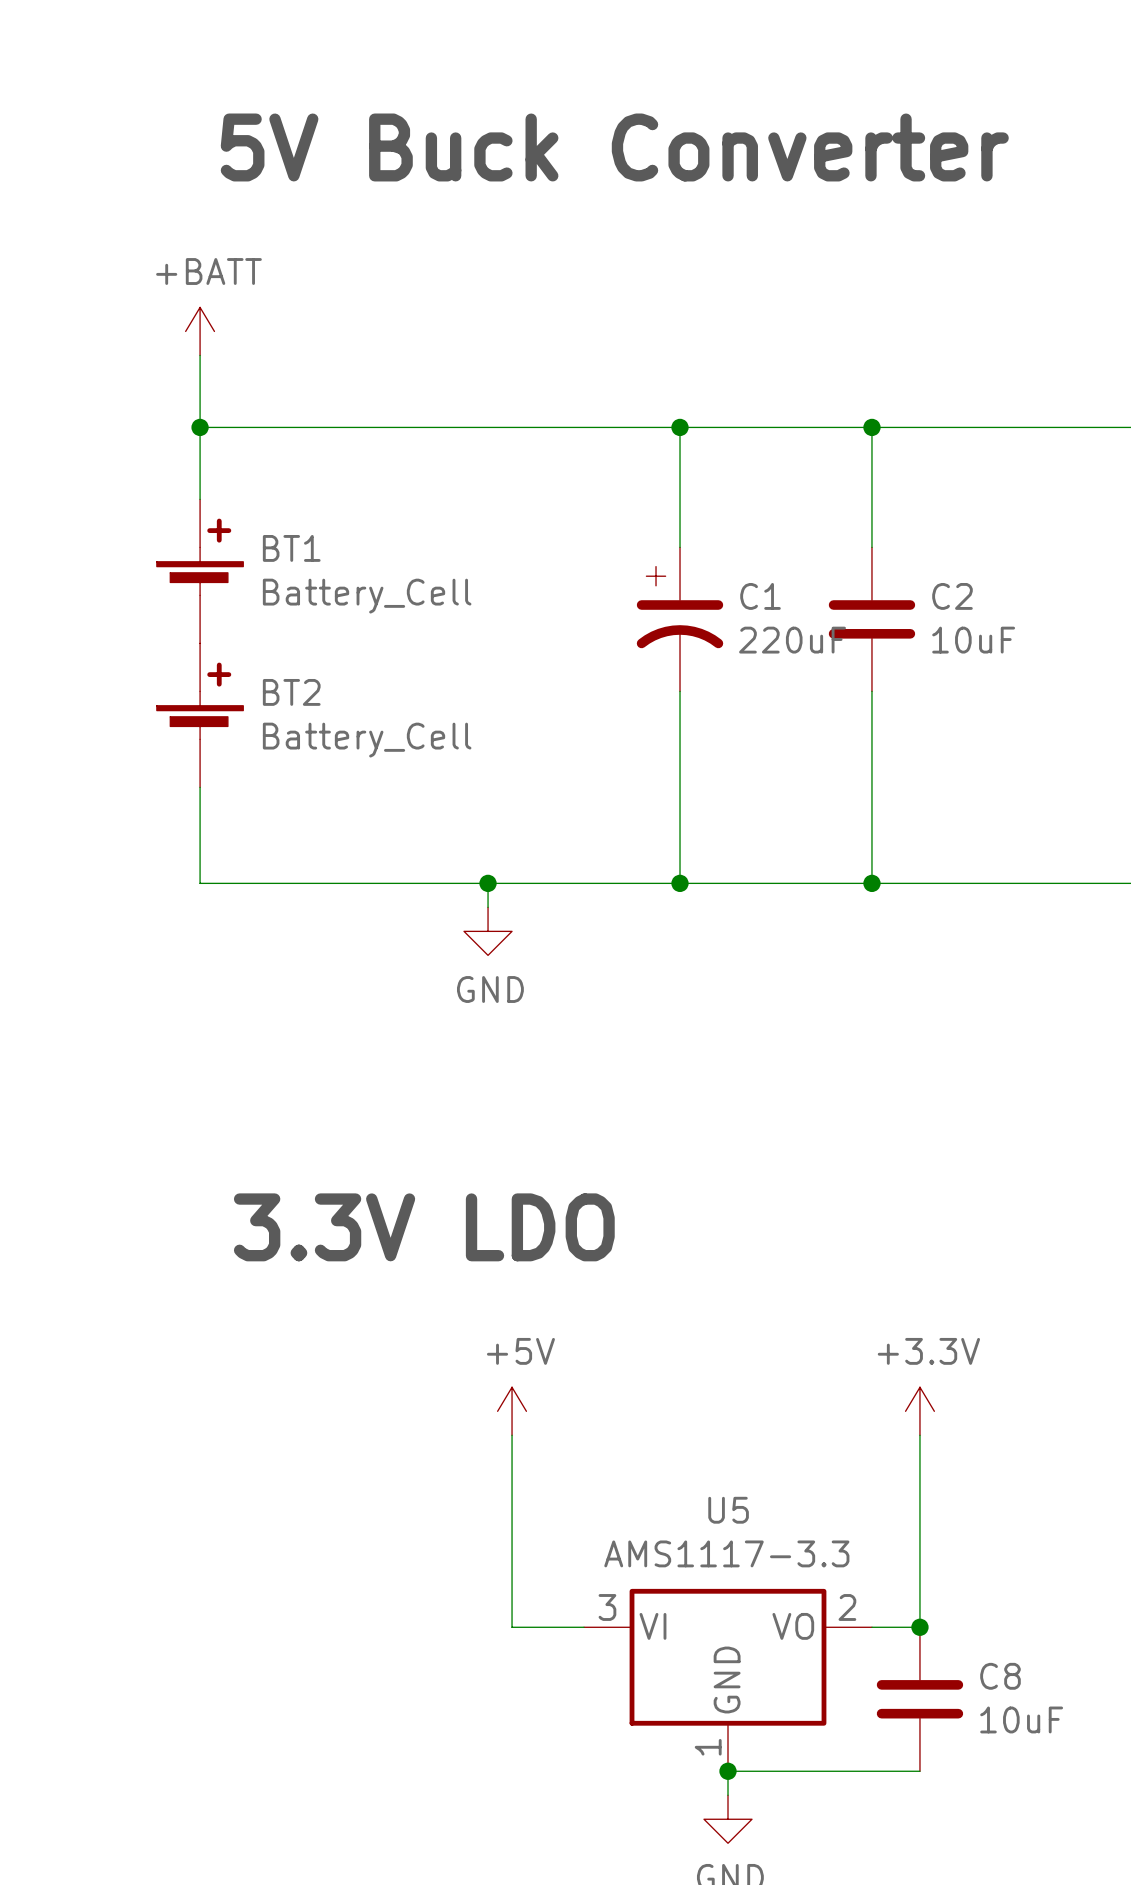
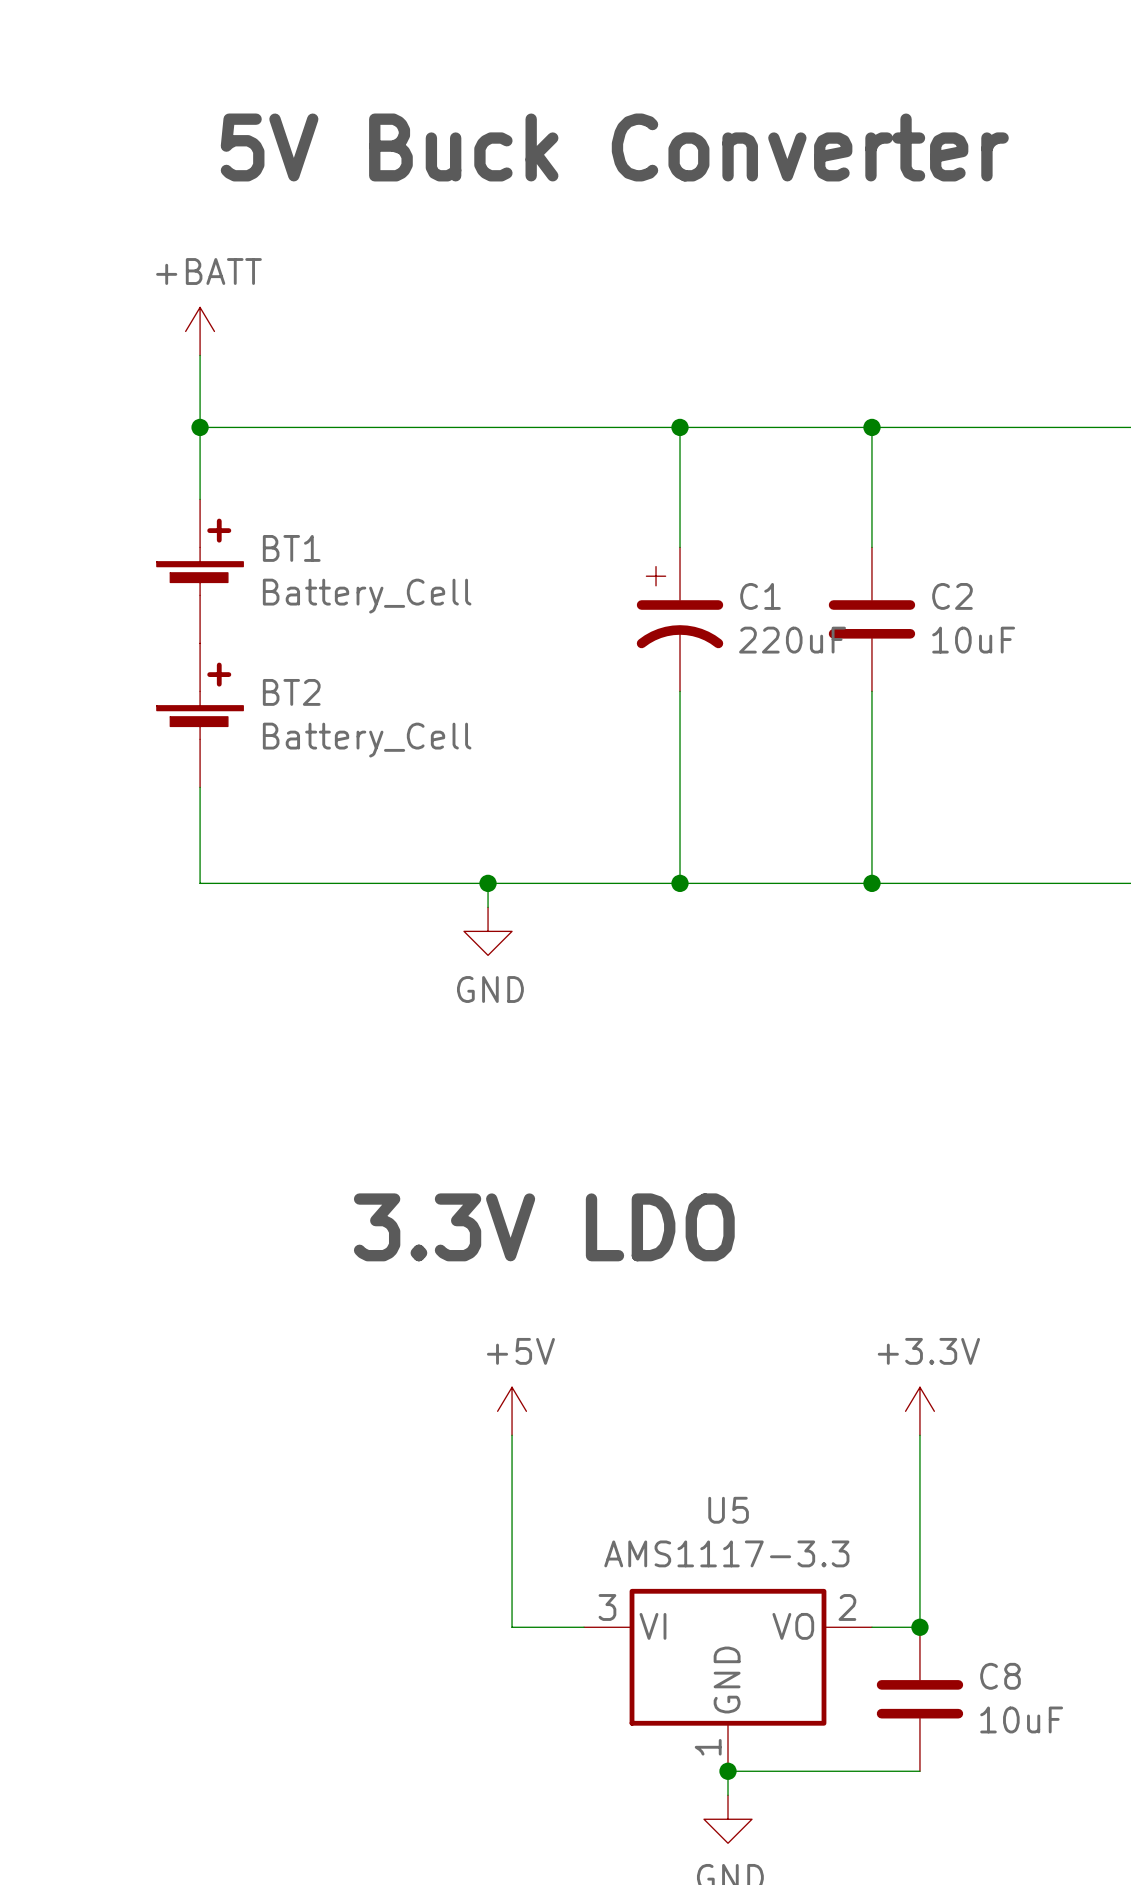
text position: 3.3V LDO (424, 1227) -> 3.3V LDO (544, 1227)

